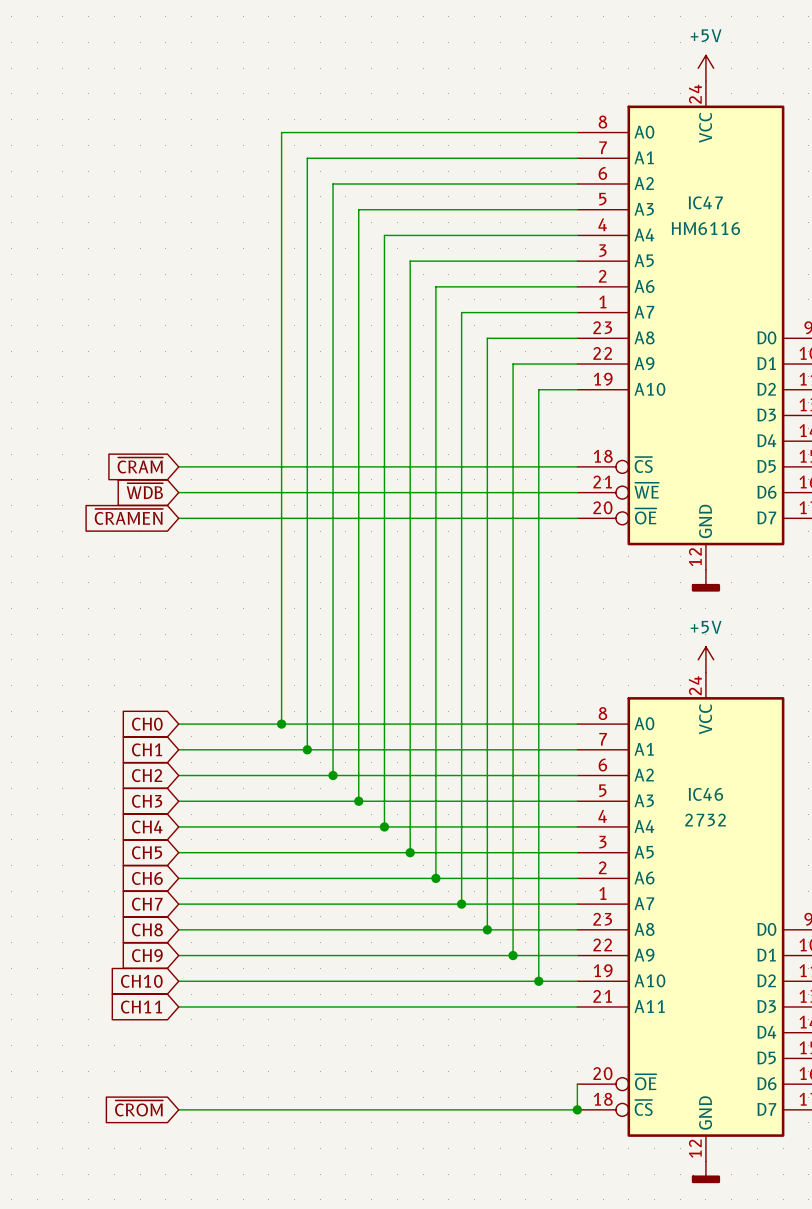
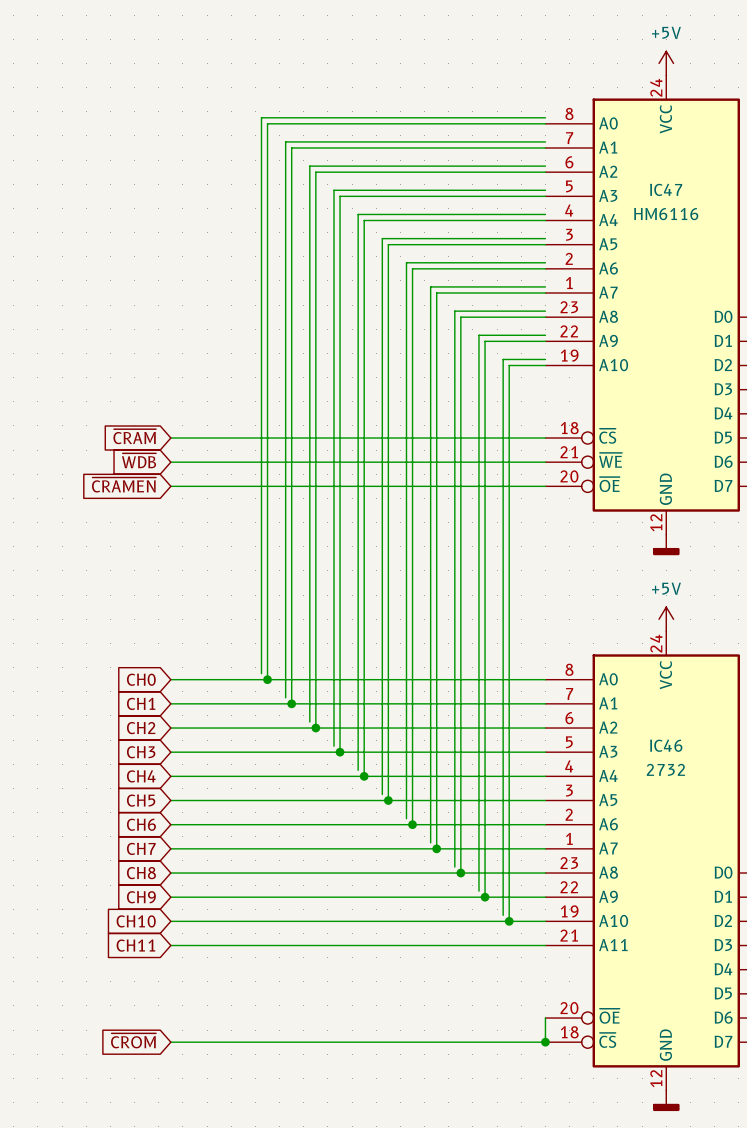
wire: none -> (545, 117) (261, 117) (261, 673)
wire: none -> (545, 141) (285, 141) (285, 697)
wire: none -> (545, 166) (309, 166) (309, 721)
wire: none -> (545, 190) (333, 190) (333, 746)
wire: none -> (545, 214) (358, 214) (358, 770)
wire: none -> (545, 238) (382, 238) (382, 794)
wire: none -> (545, 262) (406, 262) (406, 818)
wire: none -> (545, 286) (430, 286) (430, 842)
wire: none -> (545, 311) (454, 311) (454, 866)
wire: none -> (545, 335) (478, 335) (478, 891)
wire: none -> (545, 359) (503, 359) (503, 915)

